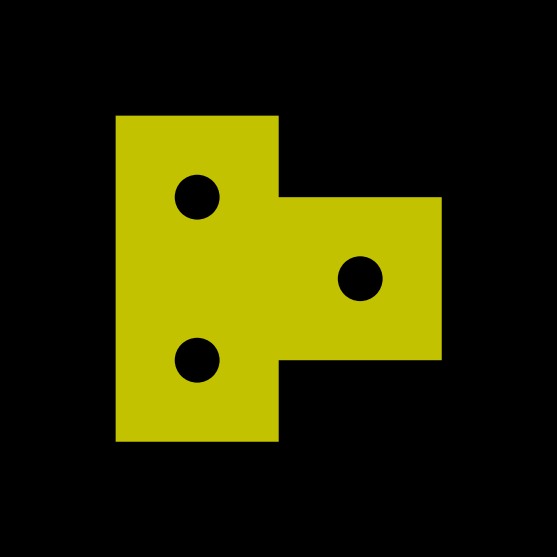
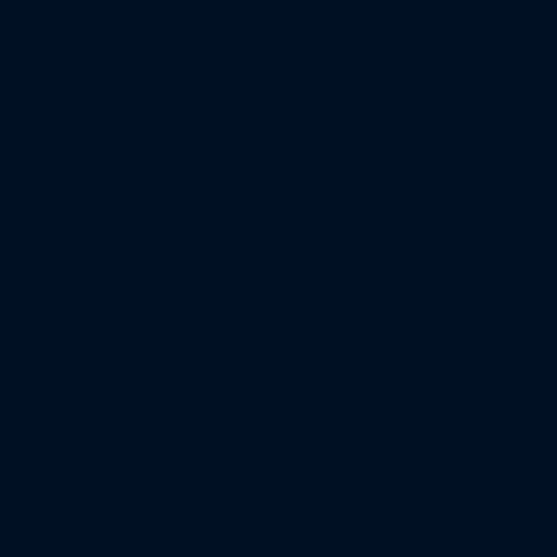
part: (278, 278) -> none

